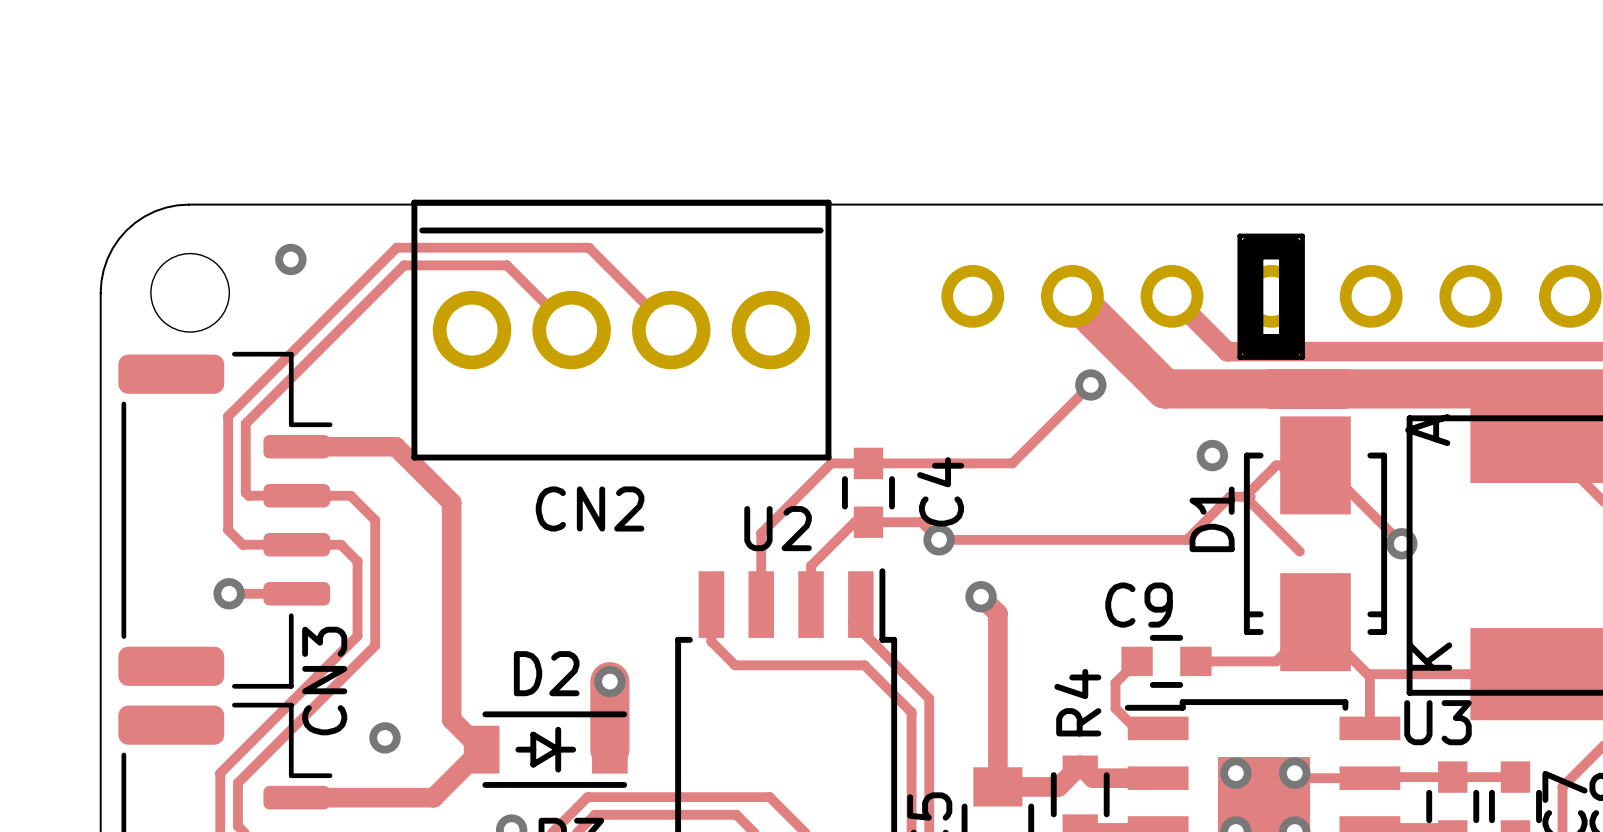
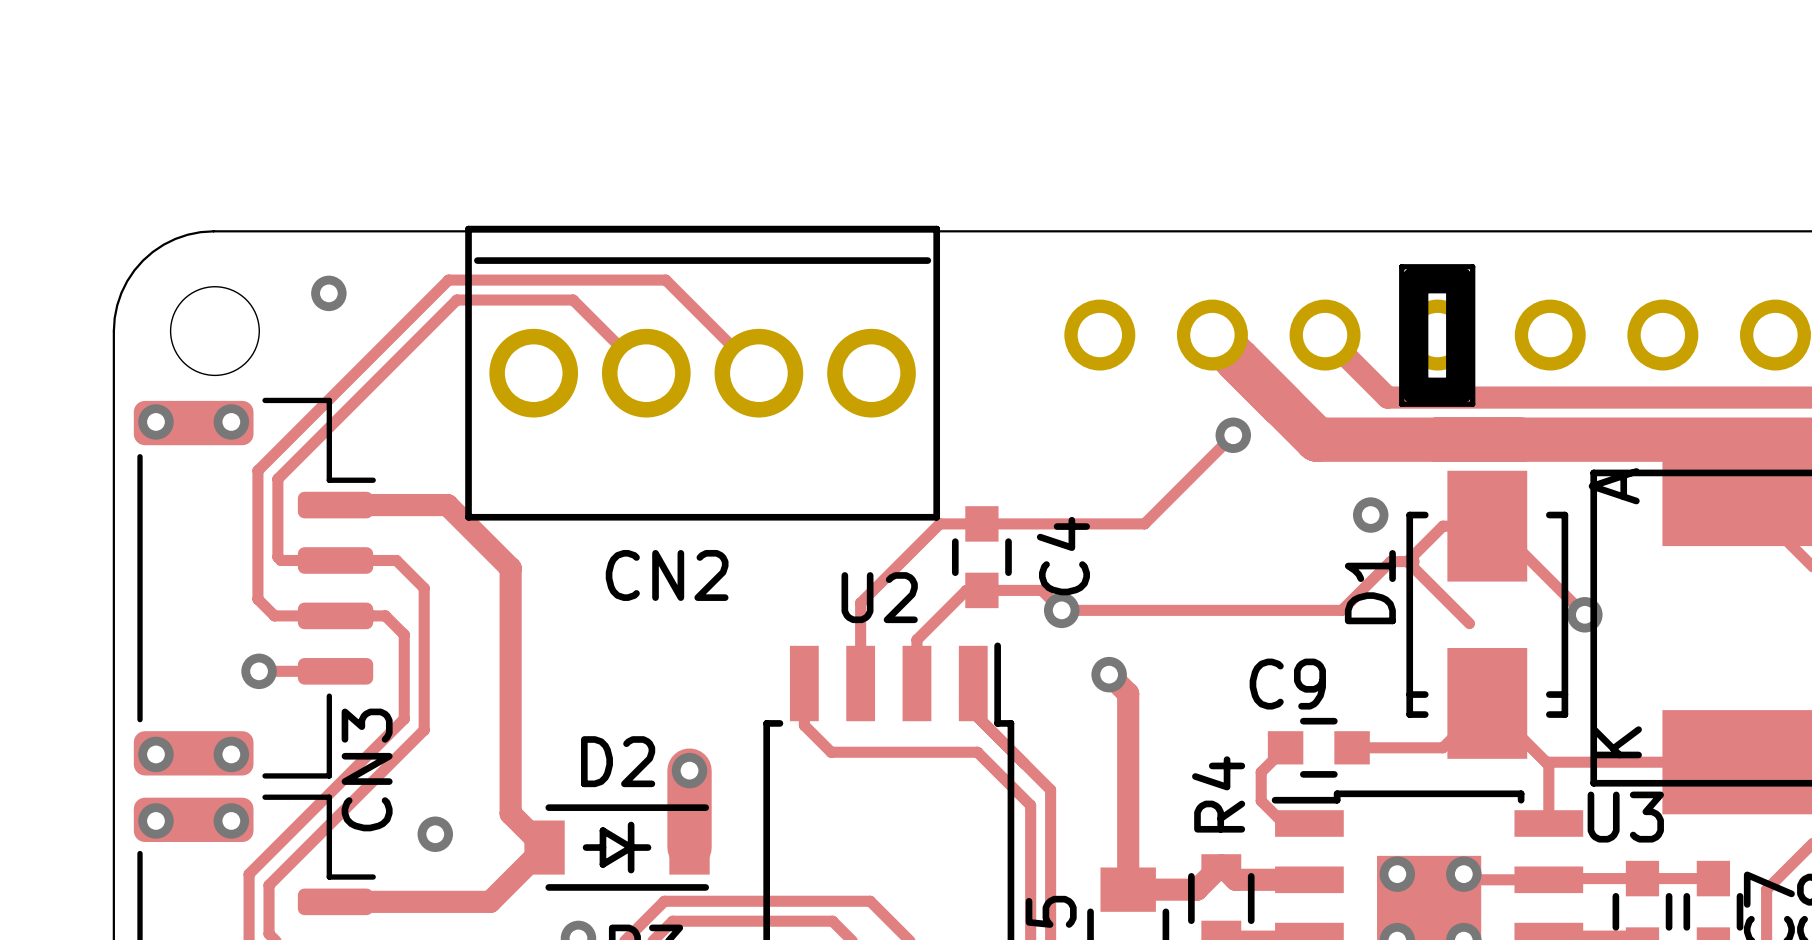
via: none -> (155, 421)
via: none -> (231, 421)
via: none -> (155, 754)
via: none -> (231, 754)
via: none -> (155, 820)
via: none -> (231, 820)

